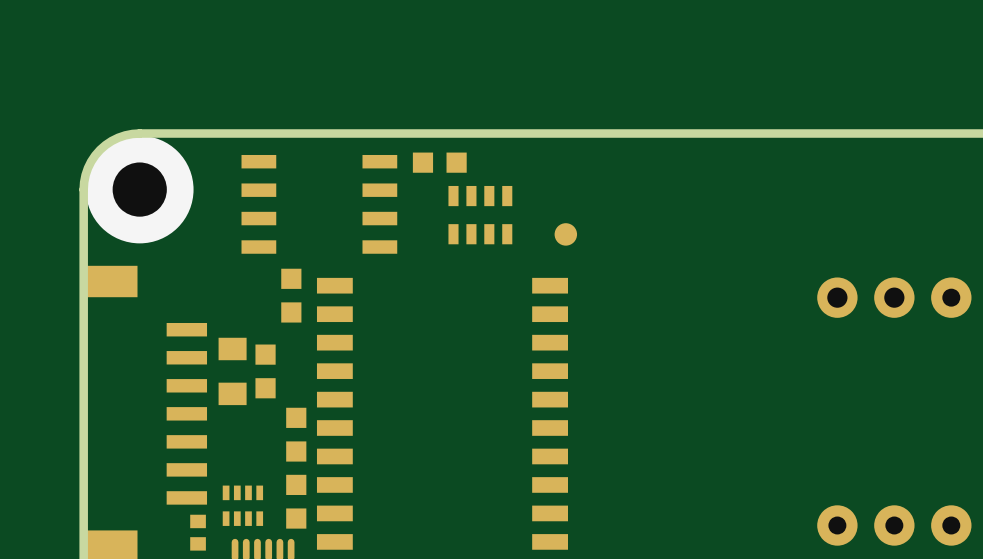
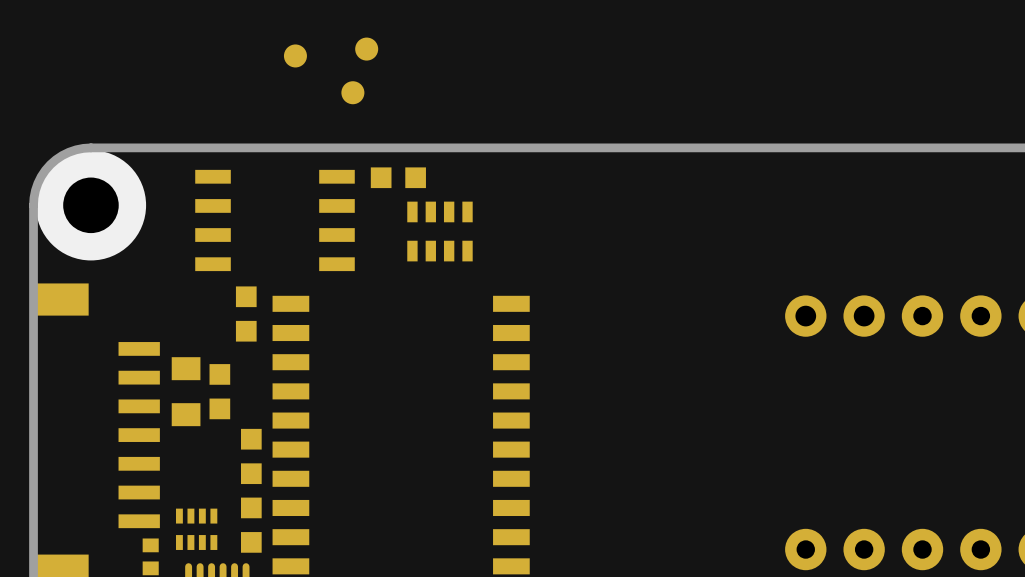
part: none -> (366, 49)
part: none -> (295, 55)
part: none -> (352, 92)
part: (565, 234) -> none

